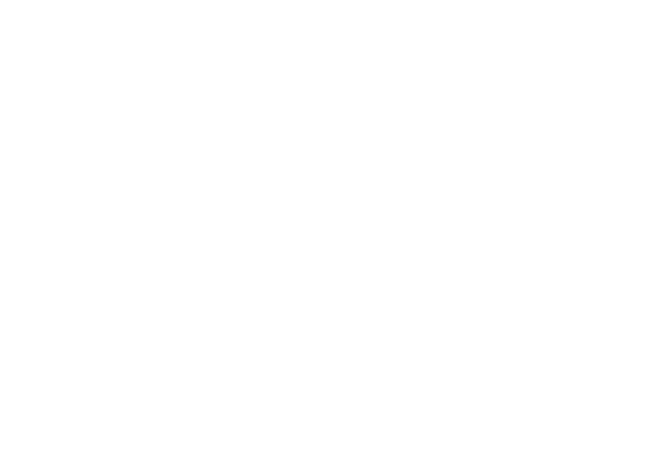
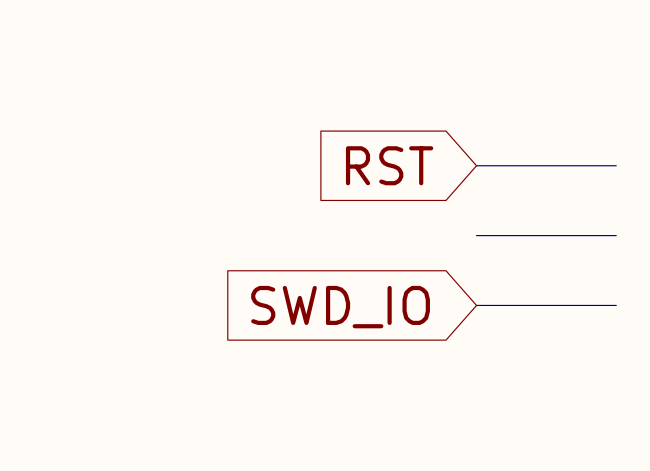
global label: none -> RST (389, 165)
wire: none -> (476, 165) (616, 165)
wire: none -> (476, 235) (616, 235)
global label: none -> SWD_IO (340, 307)
wire: none -> (476, 305) (616, 305)

